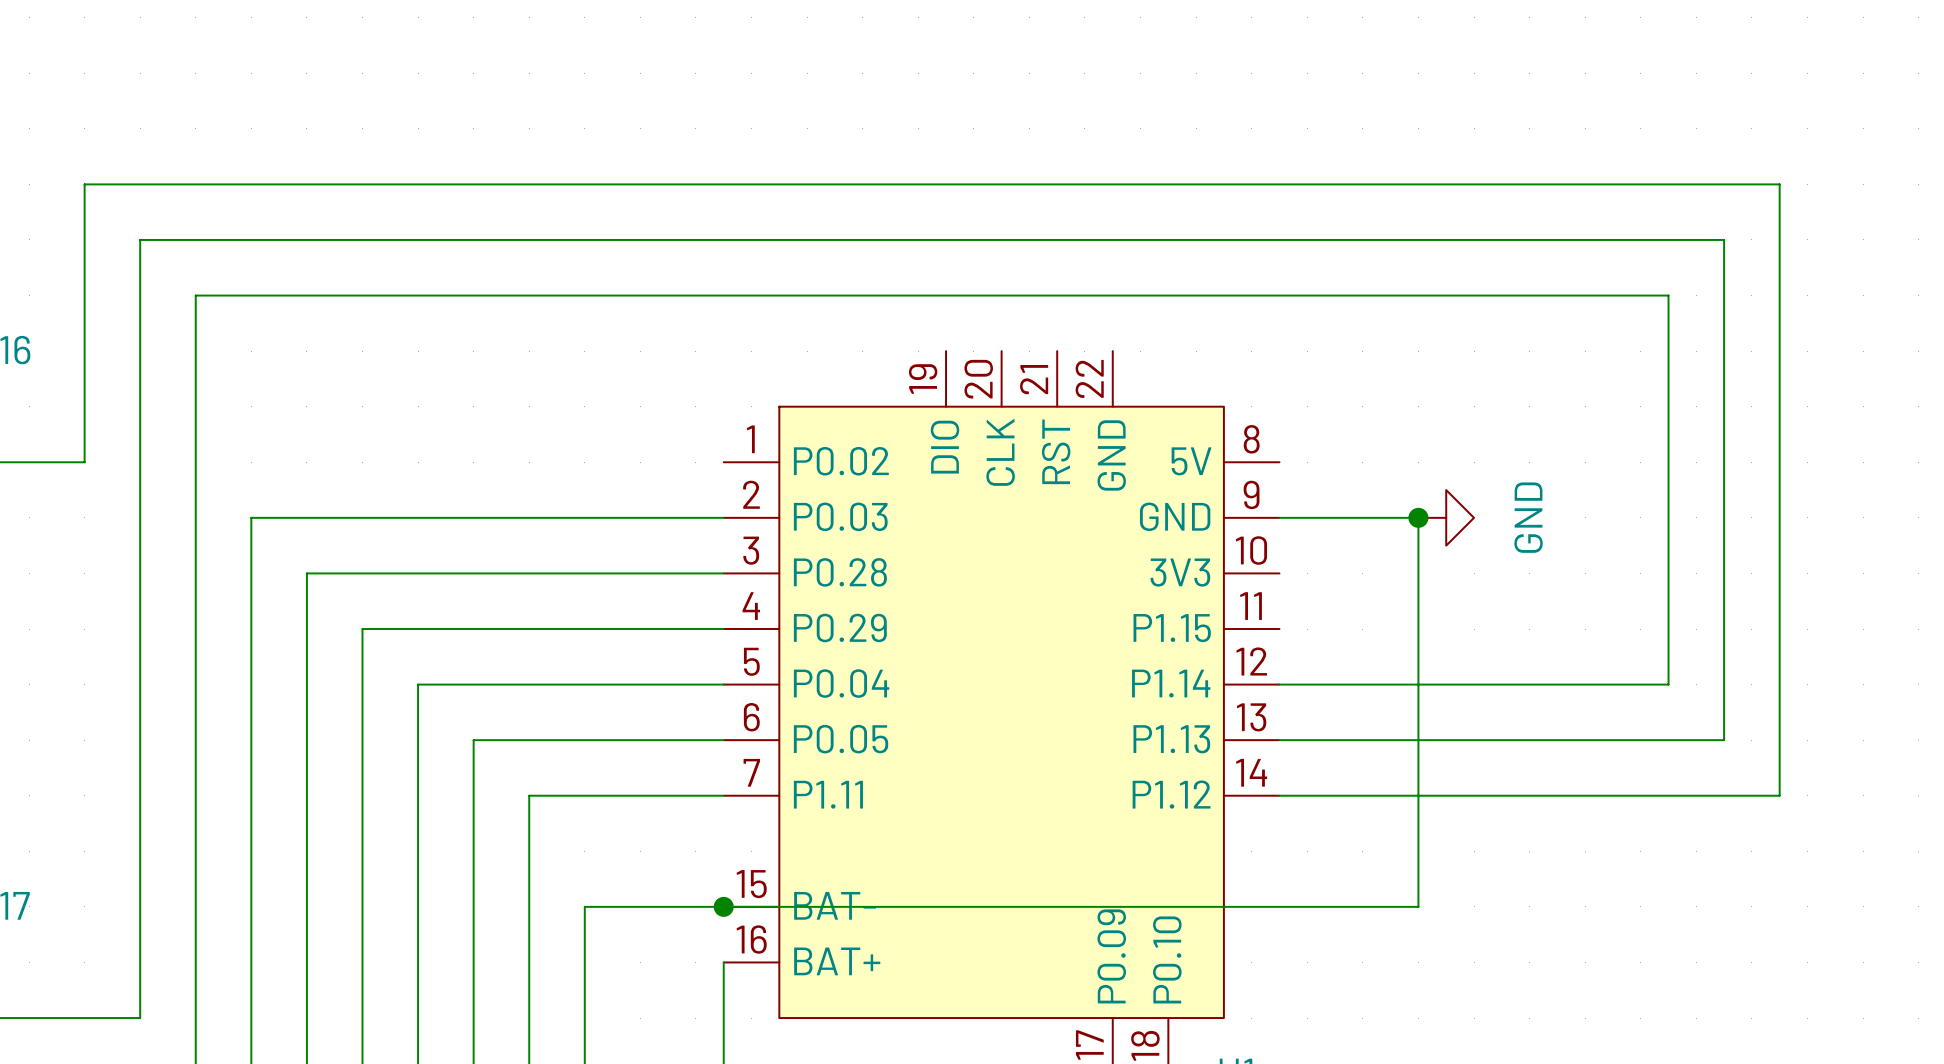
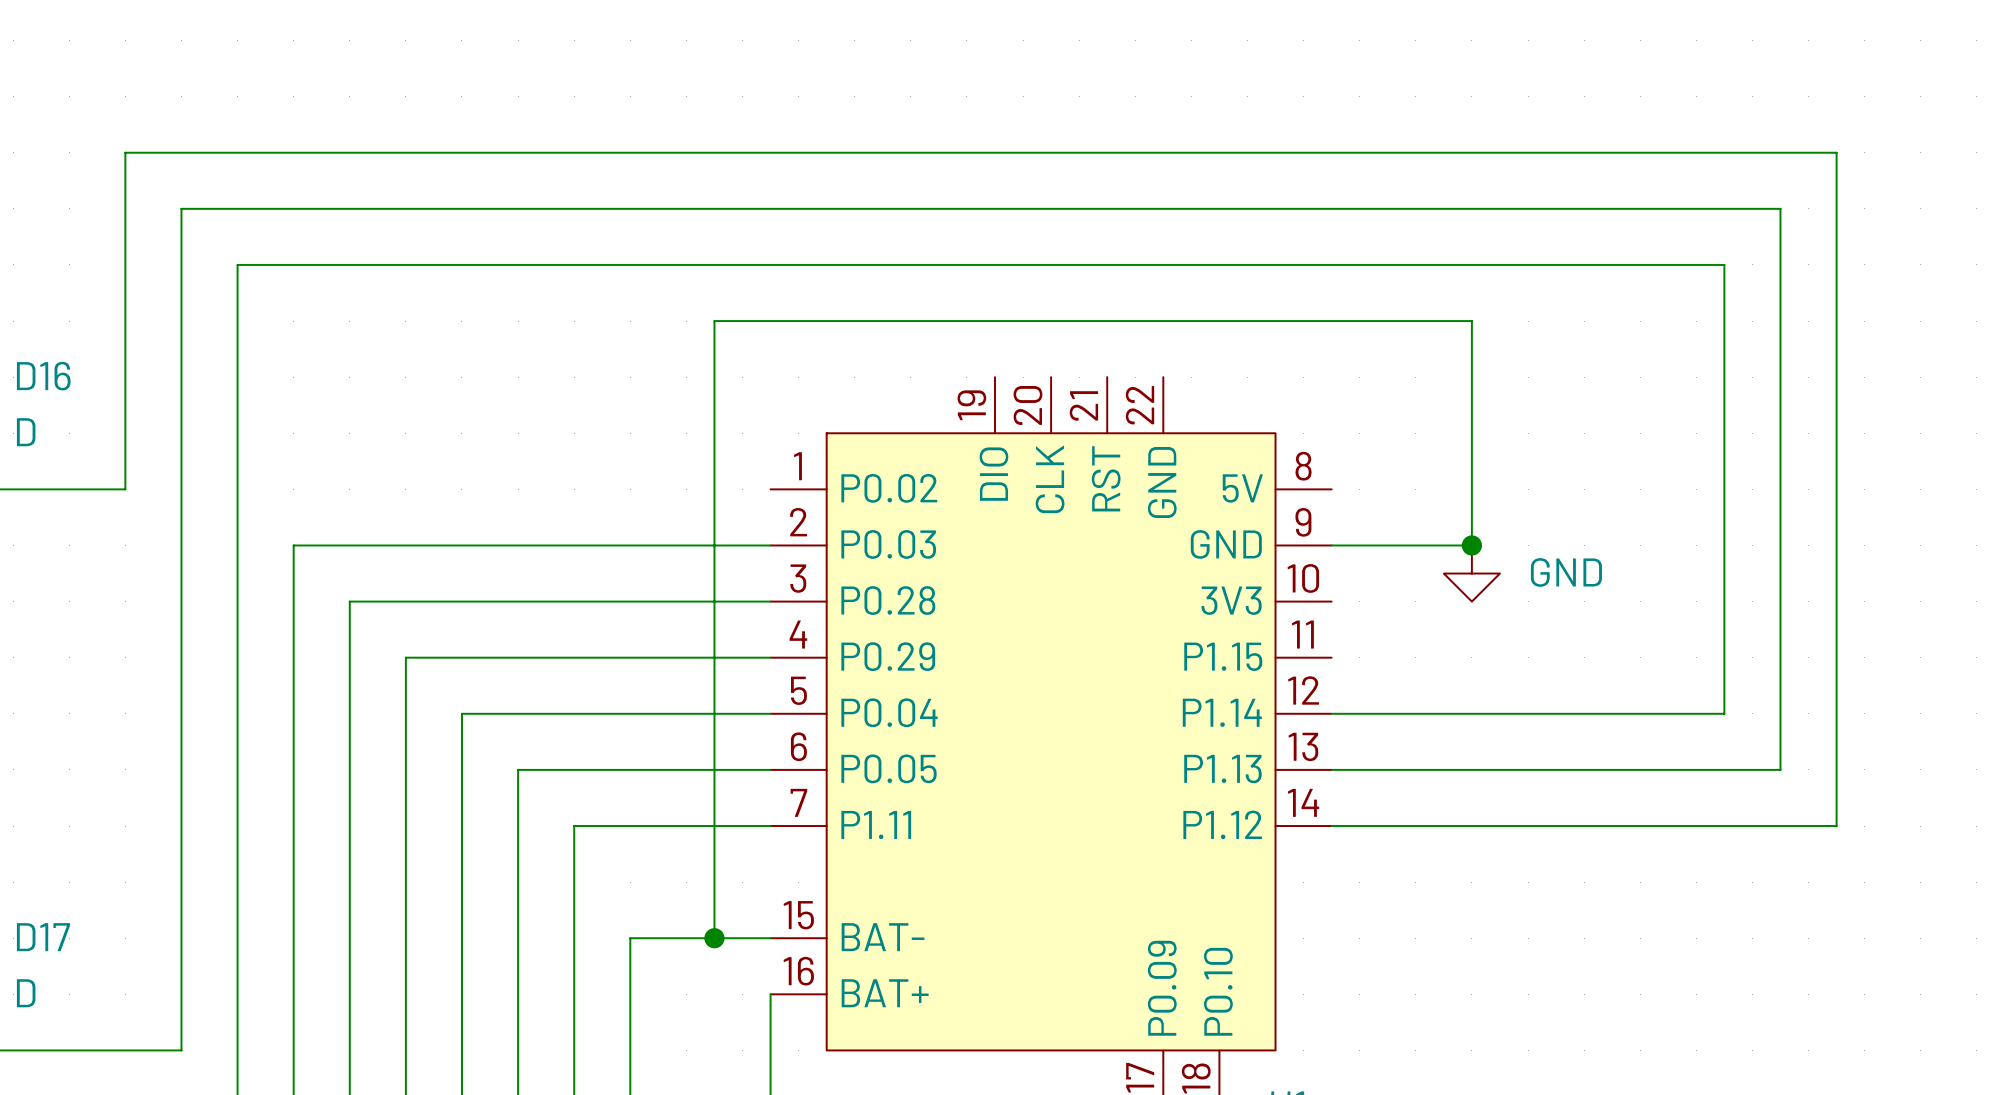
wire: (84, 184) (140, 184) -> (125, 208) (125, 152) (1836, 152) (1836, 208)
wire: (1724, 184) (1779, 184) -> (1780, 208) (1780, 264)
wire: (140, 239) (195, 239) -> (181, 264) (181, 208)
wire: (1668, 239) (1724, 239) -> (1724, 264) (1724, 321)
wire: (195, 295) (668, 295) -> (237, 321) (237, 264)
wire: none -> (714, 321) (714, 938)
wire: (1418, 295) (1668, 295) -> (1471, 321) (1471, 545)
wire: (1418, 517) (1418, 906) (723, 906) -> none
power symbol rotation: 0° (1446, 517) -> 90° clockwise (1471, 573)
power symbol position: GND (1446, 517) -> GND (1471, 573)
junction position: (723, 906) -> (714, 938)

